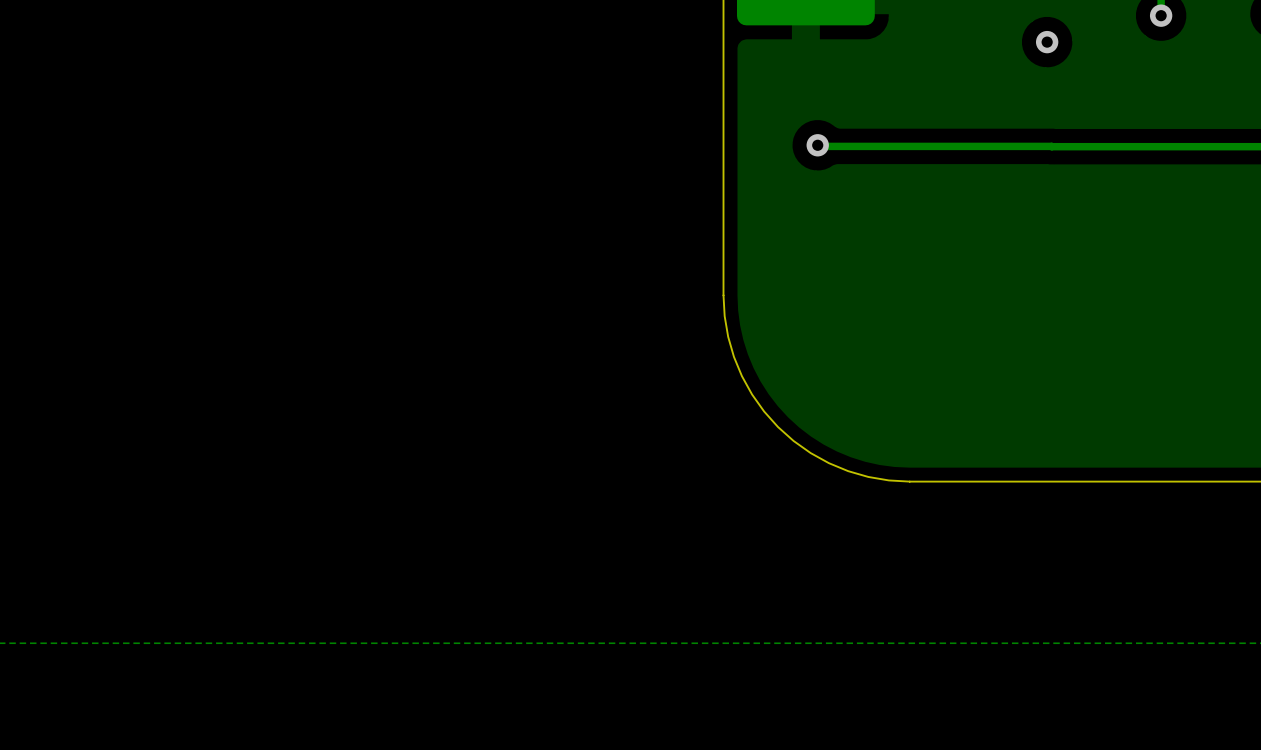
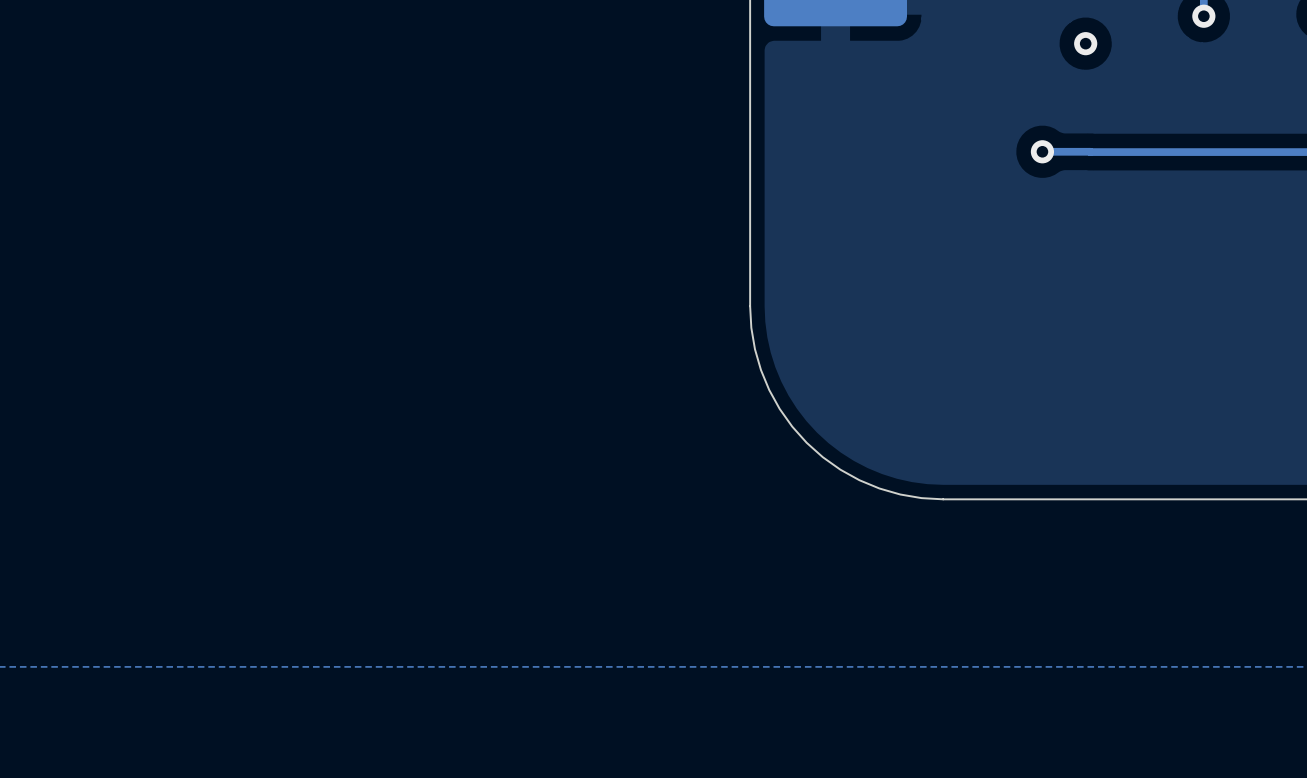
track: (817, 145) (1005, 146) -> none
via position: (817, 145) -> (1042, 151)

